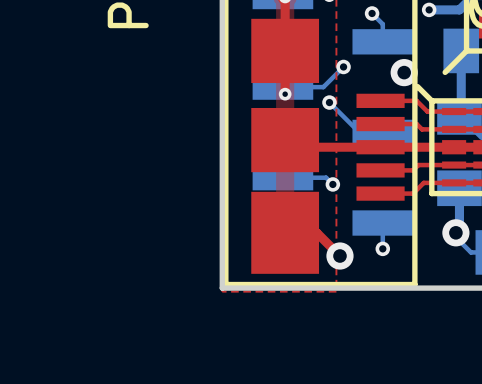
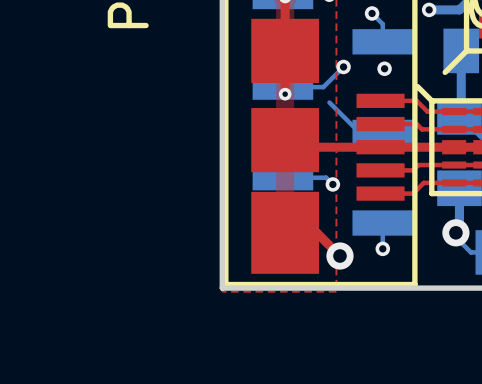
via: (404, 72) -> none
via position: (329, 102) -> (384, 68)

